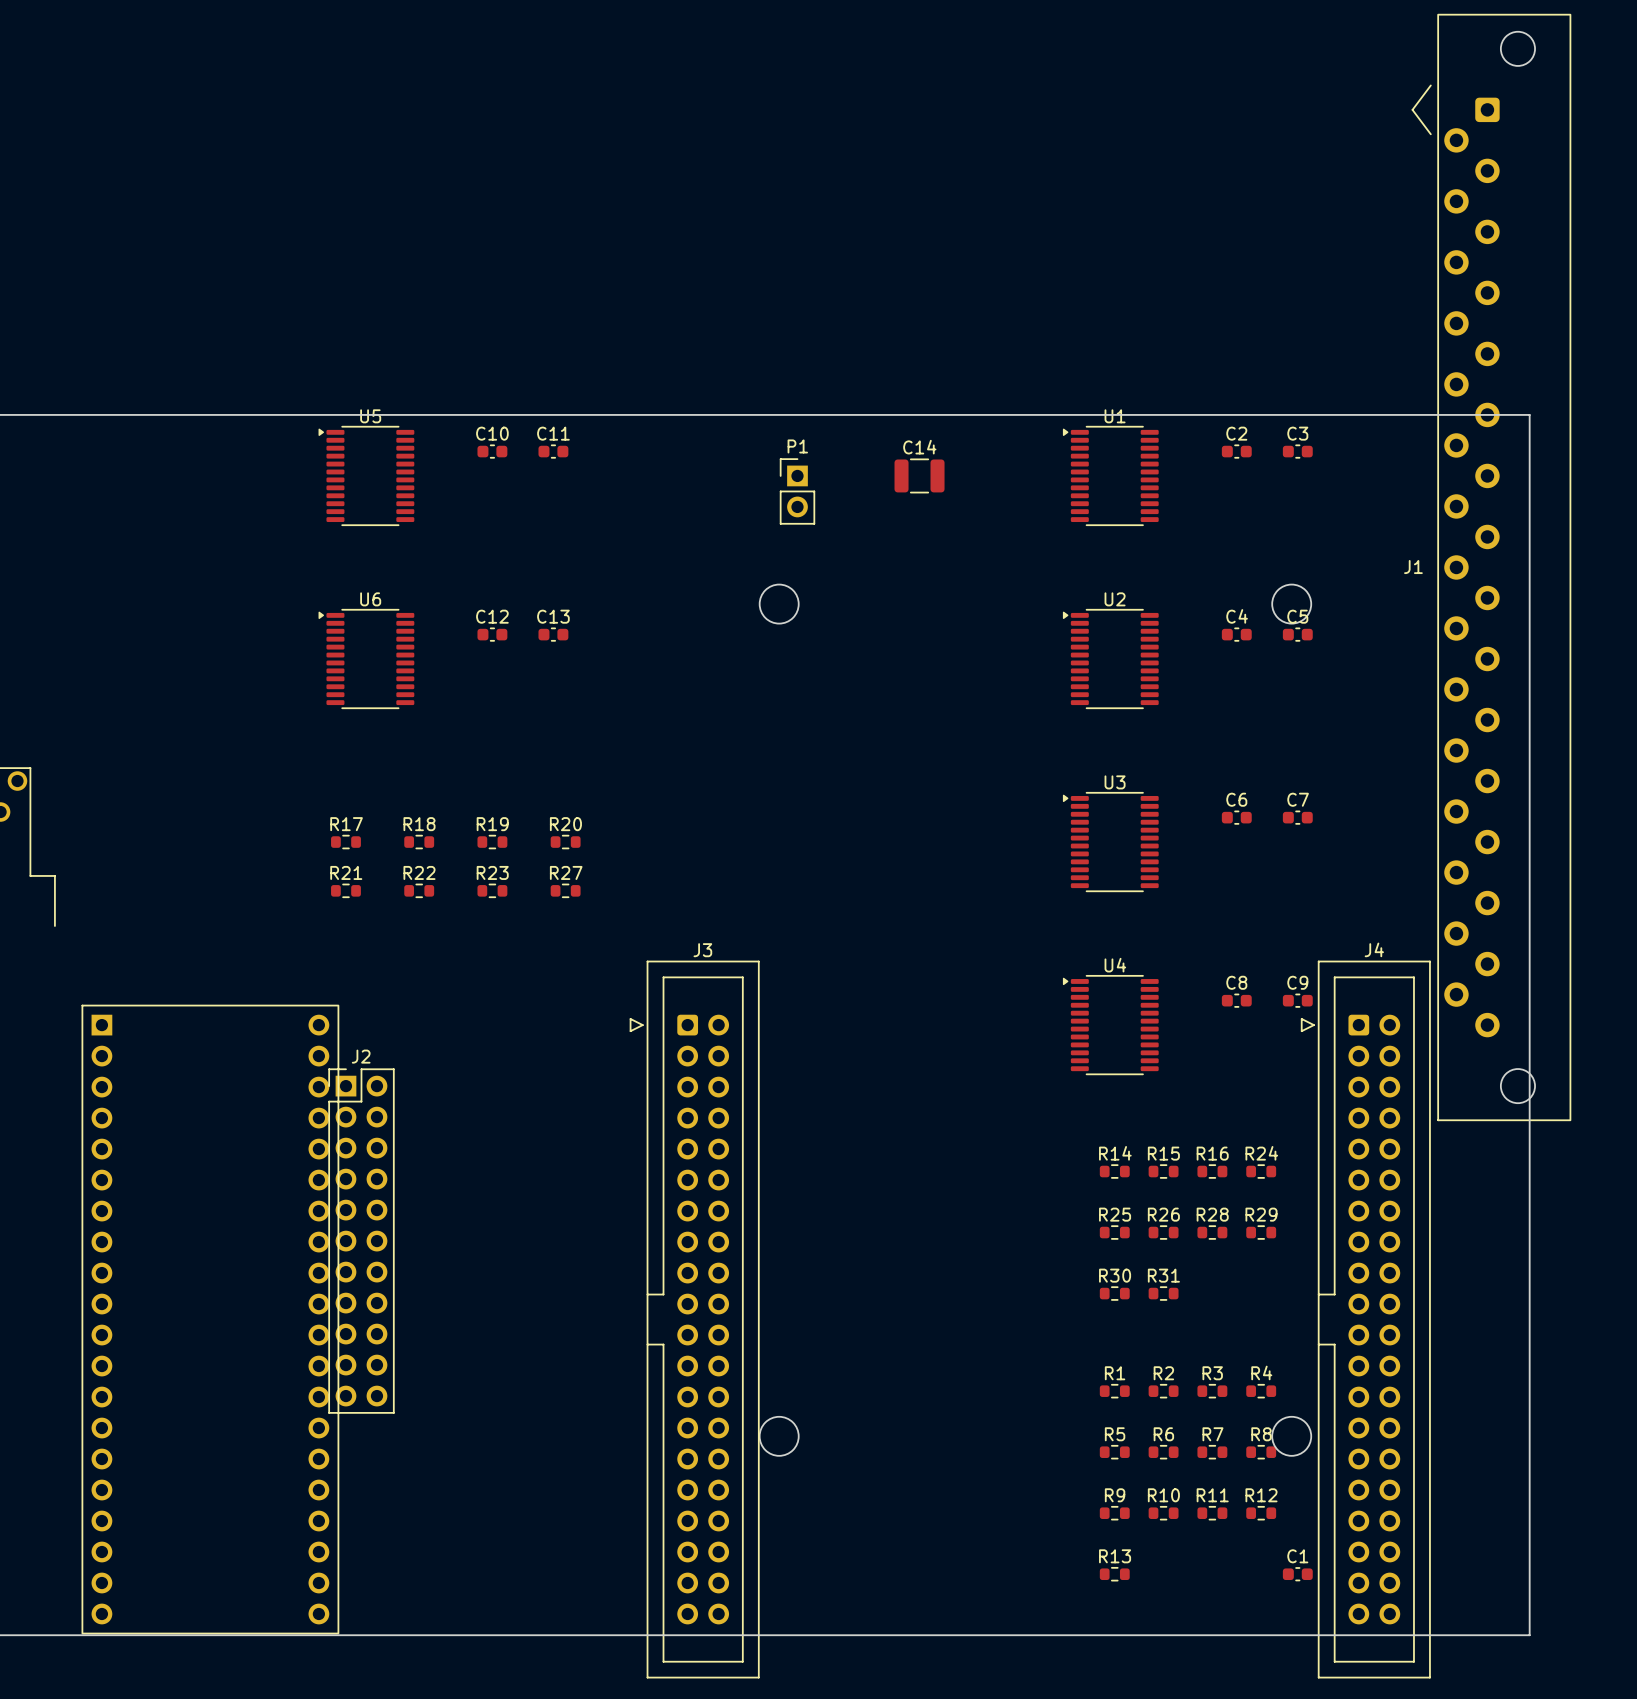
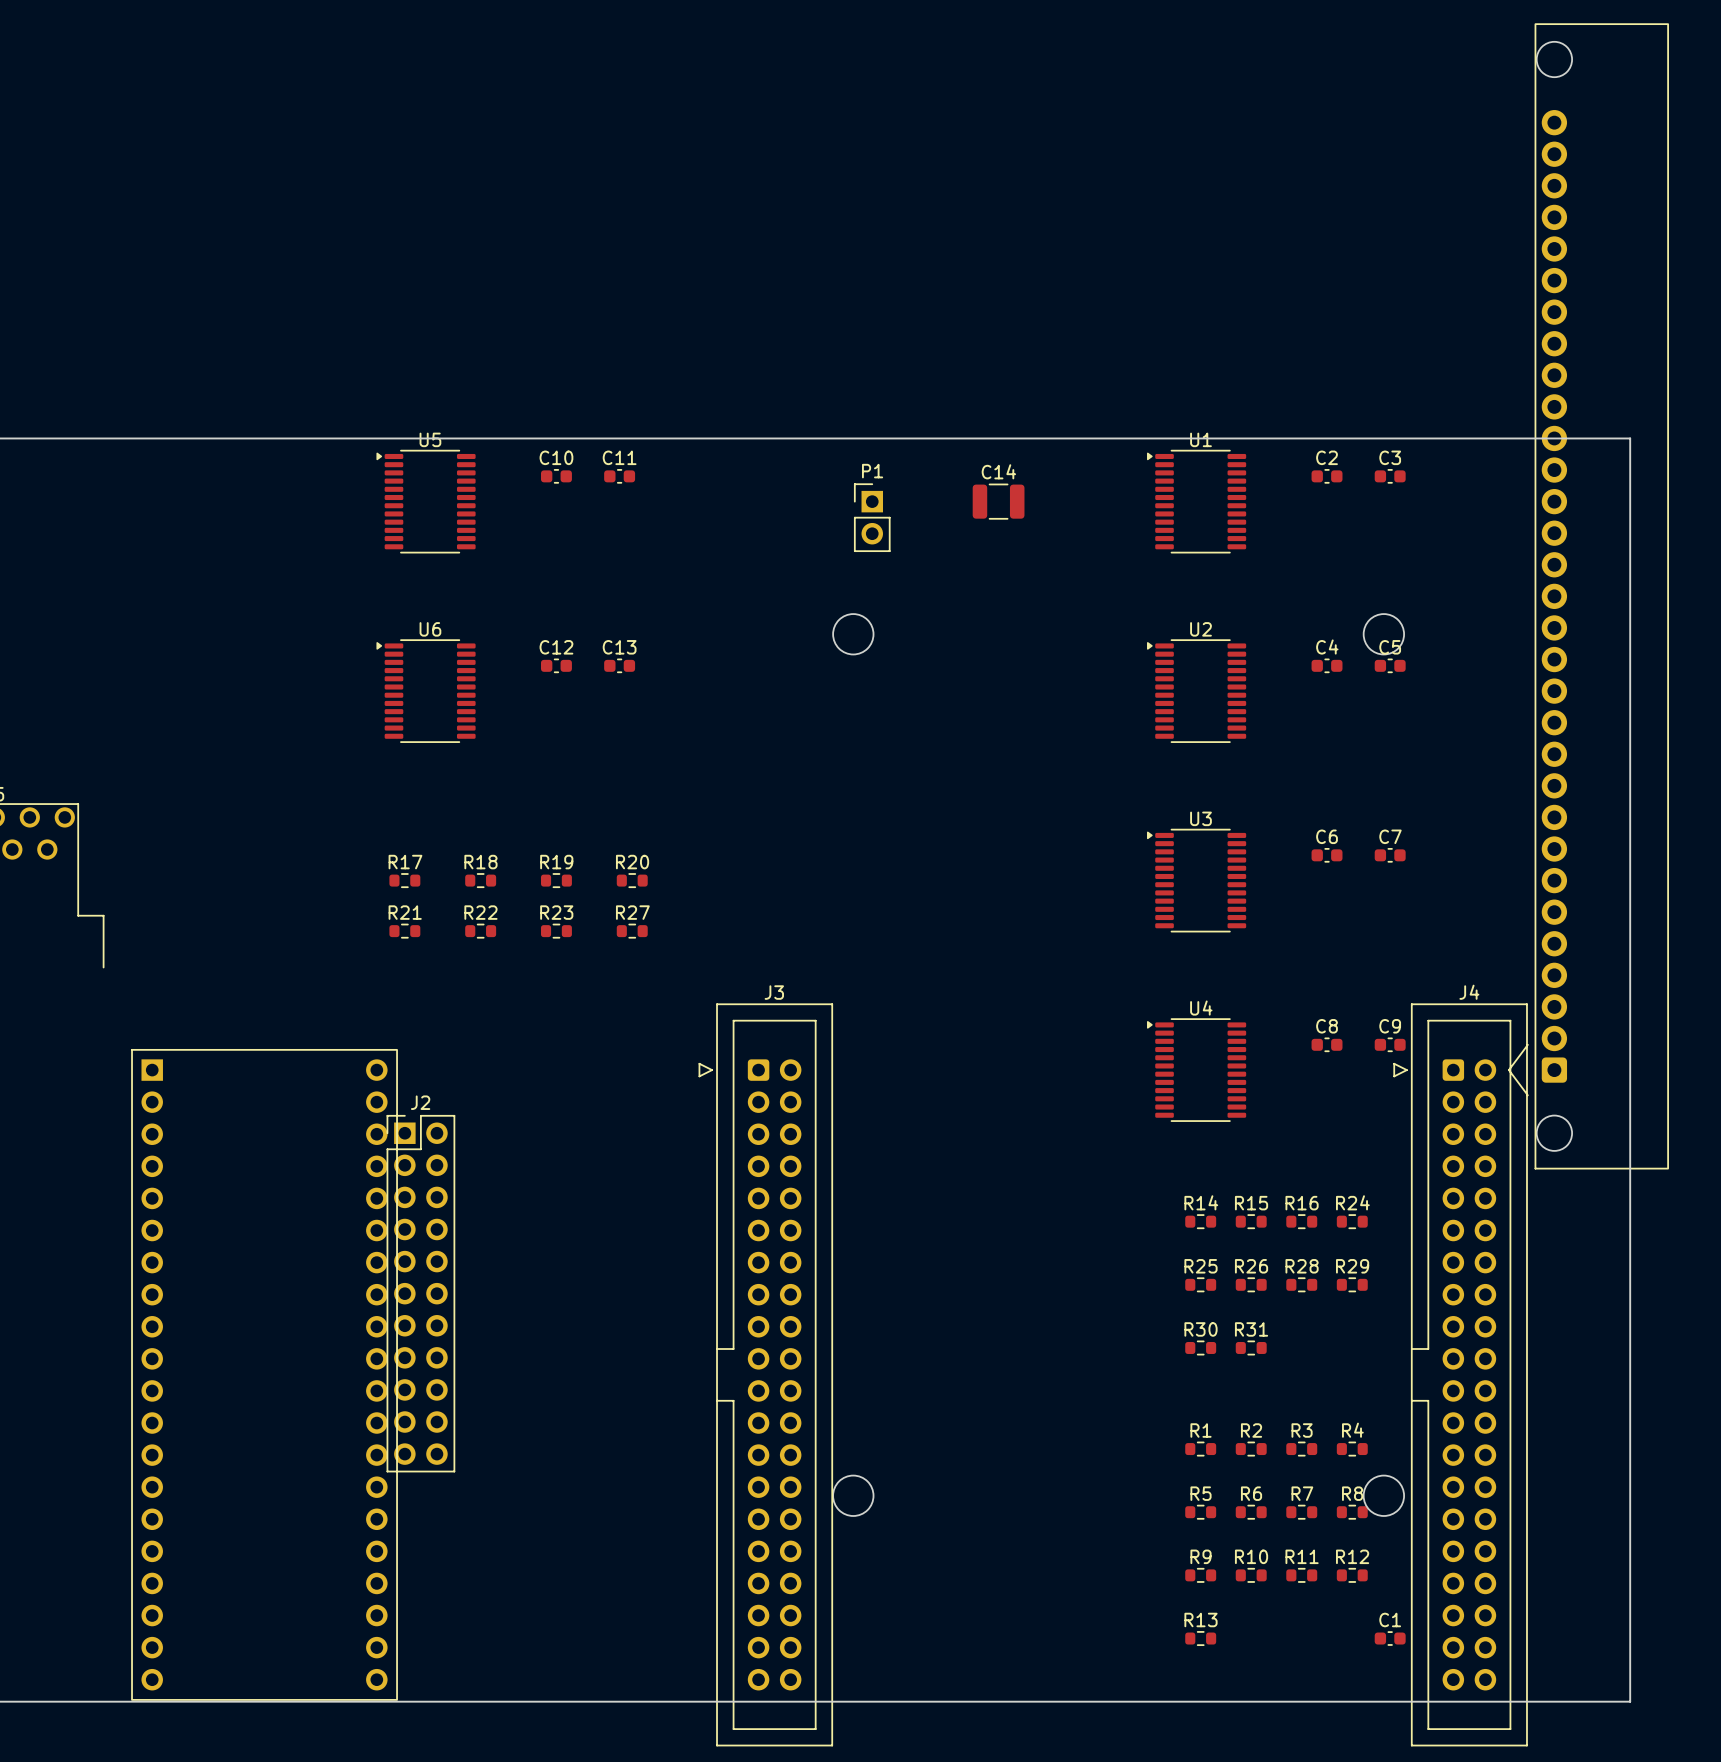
part: none -> (1588, 596)
J1: (1491, 567) -> none

